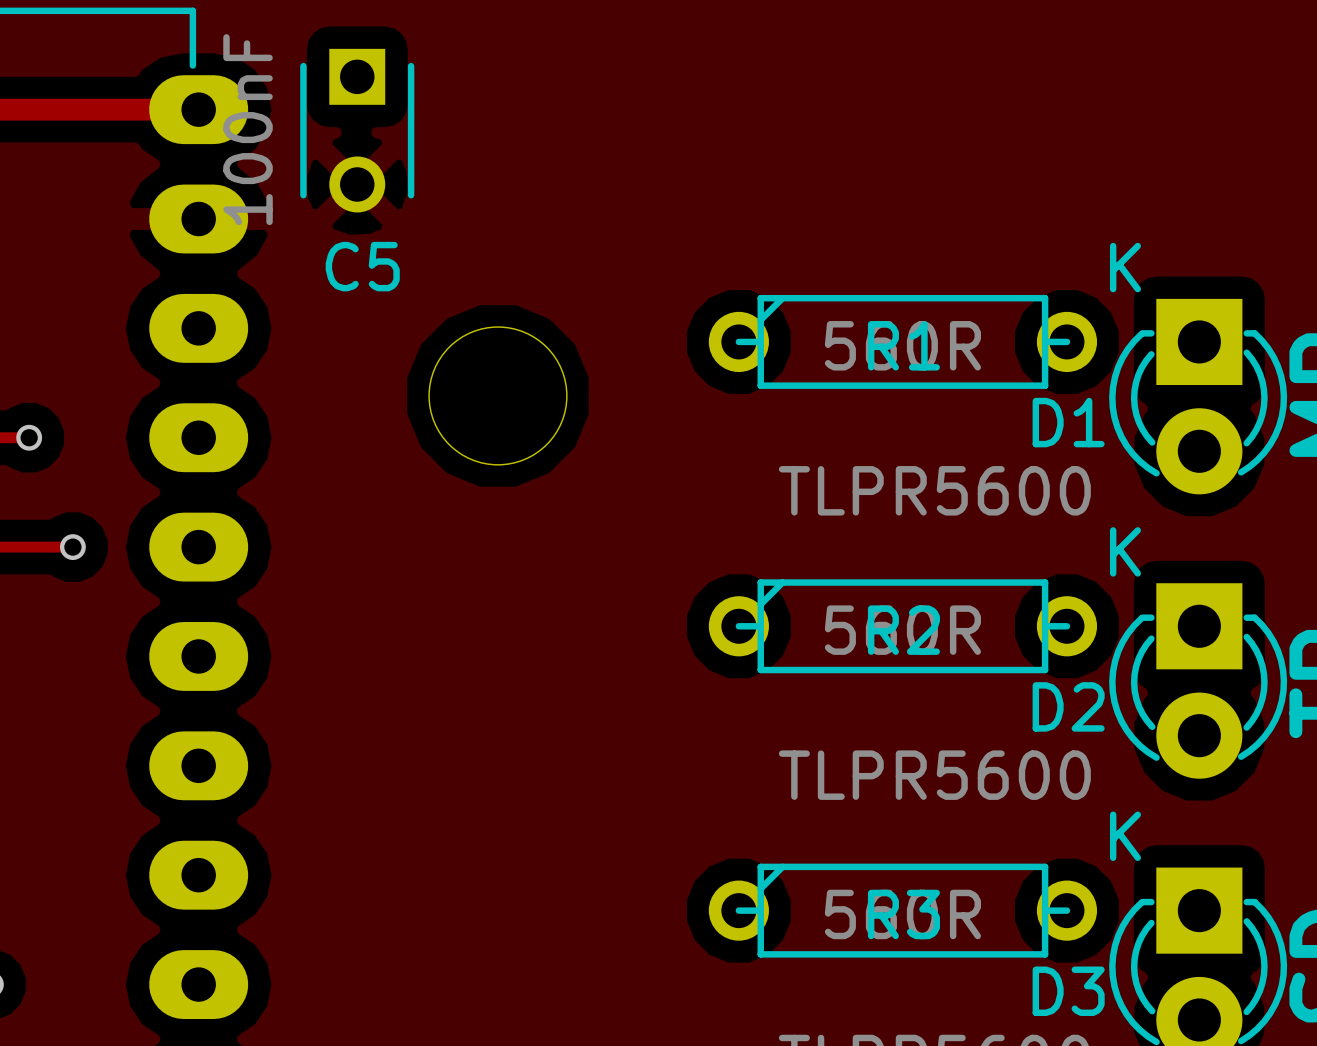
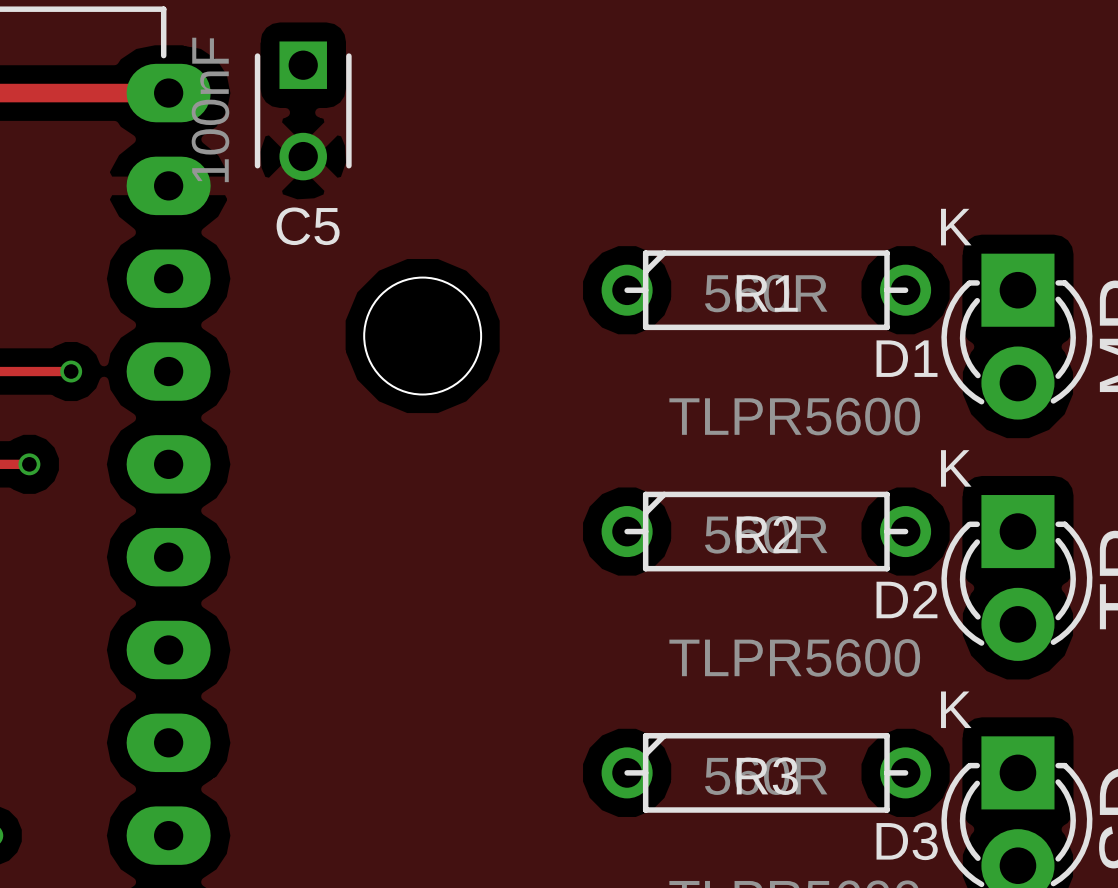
track: none -> (24, 371) (71, 371)
via: (29, 437) -> none
via: none -> (71, 371)
track: (34, 547) (72, 547) -> none
via position: (72, 547) -> (29, 464)

